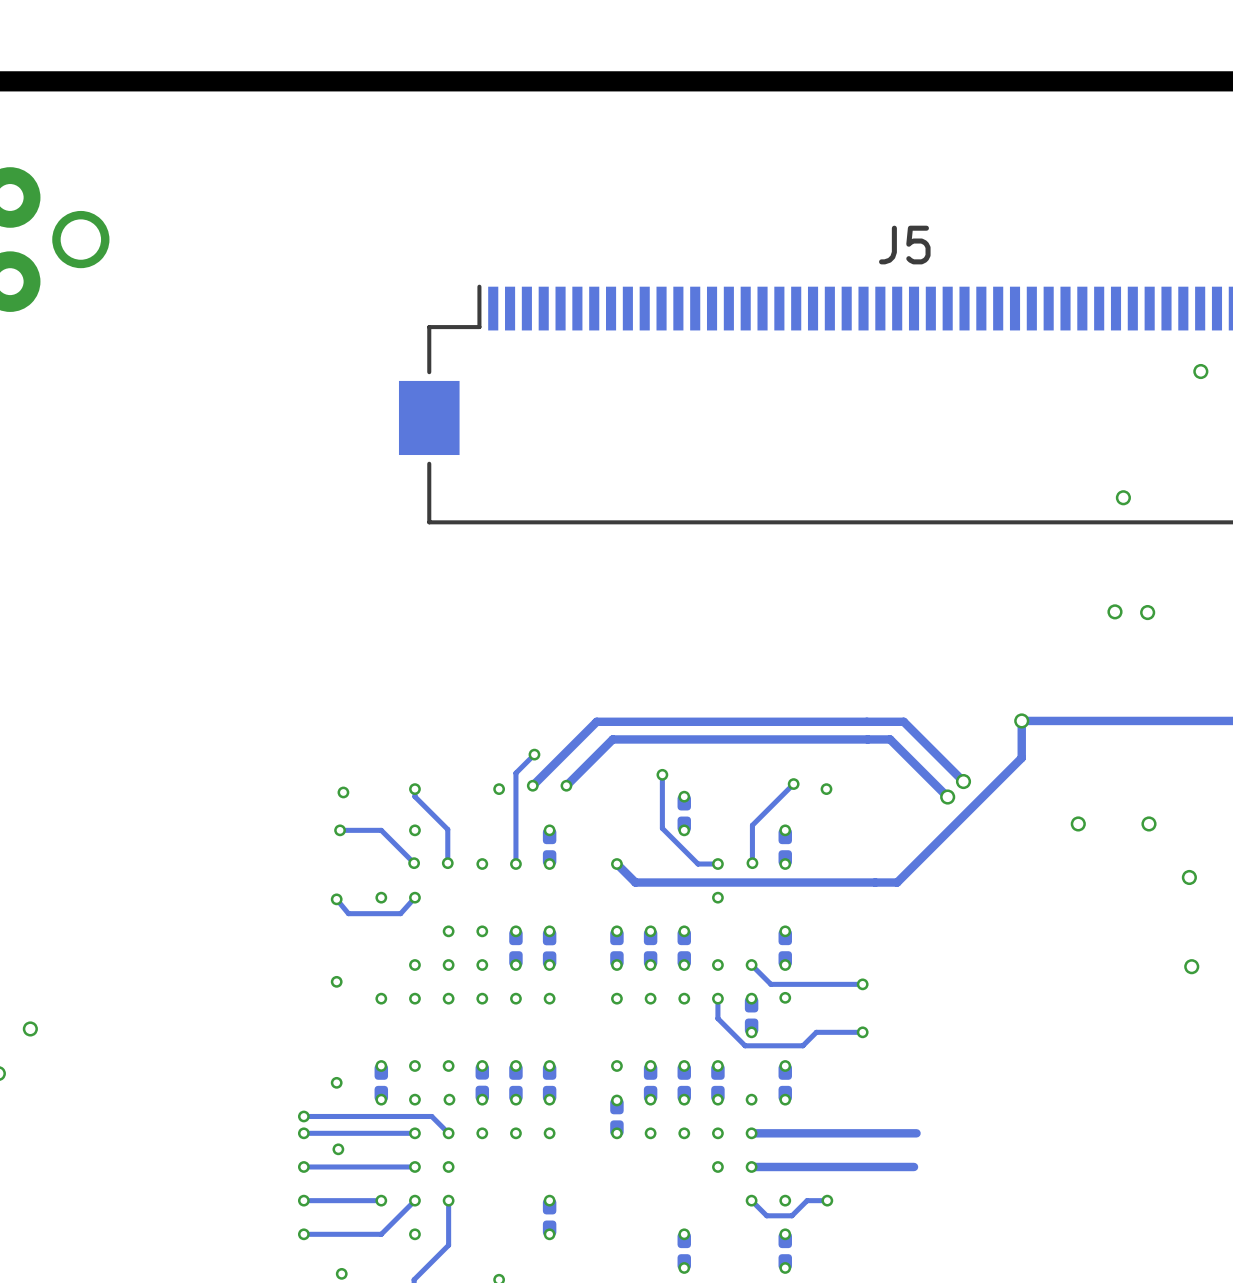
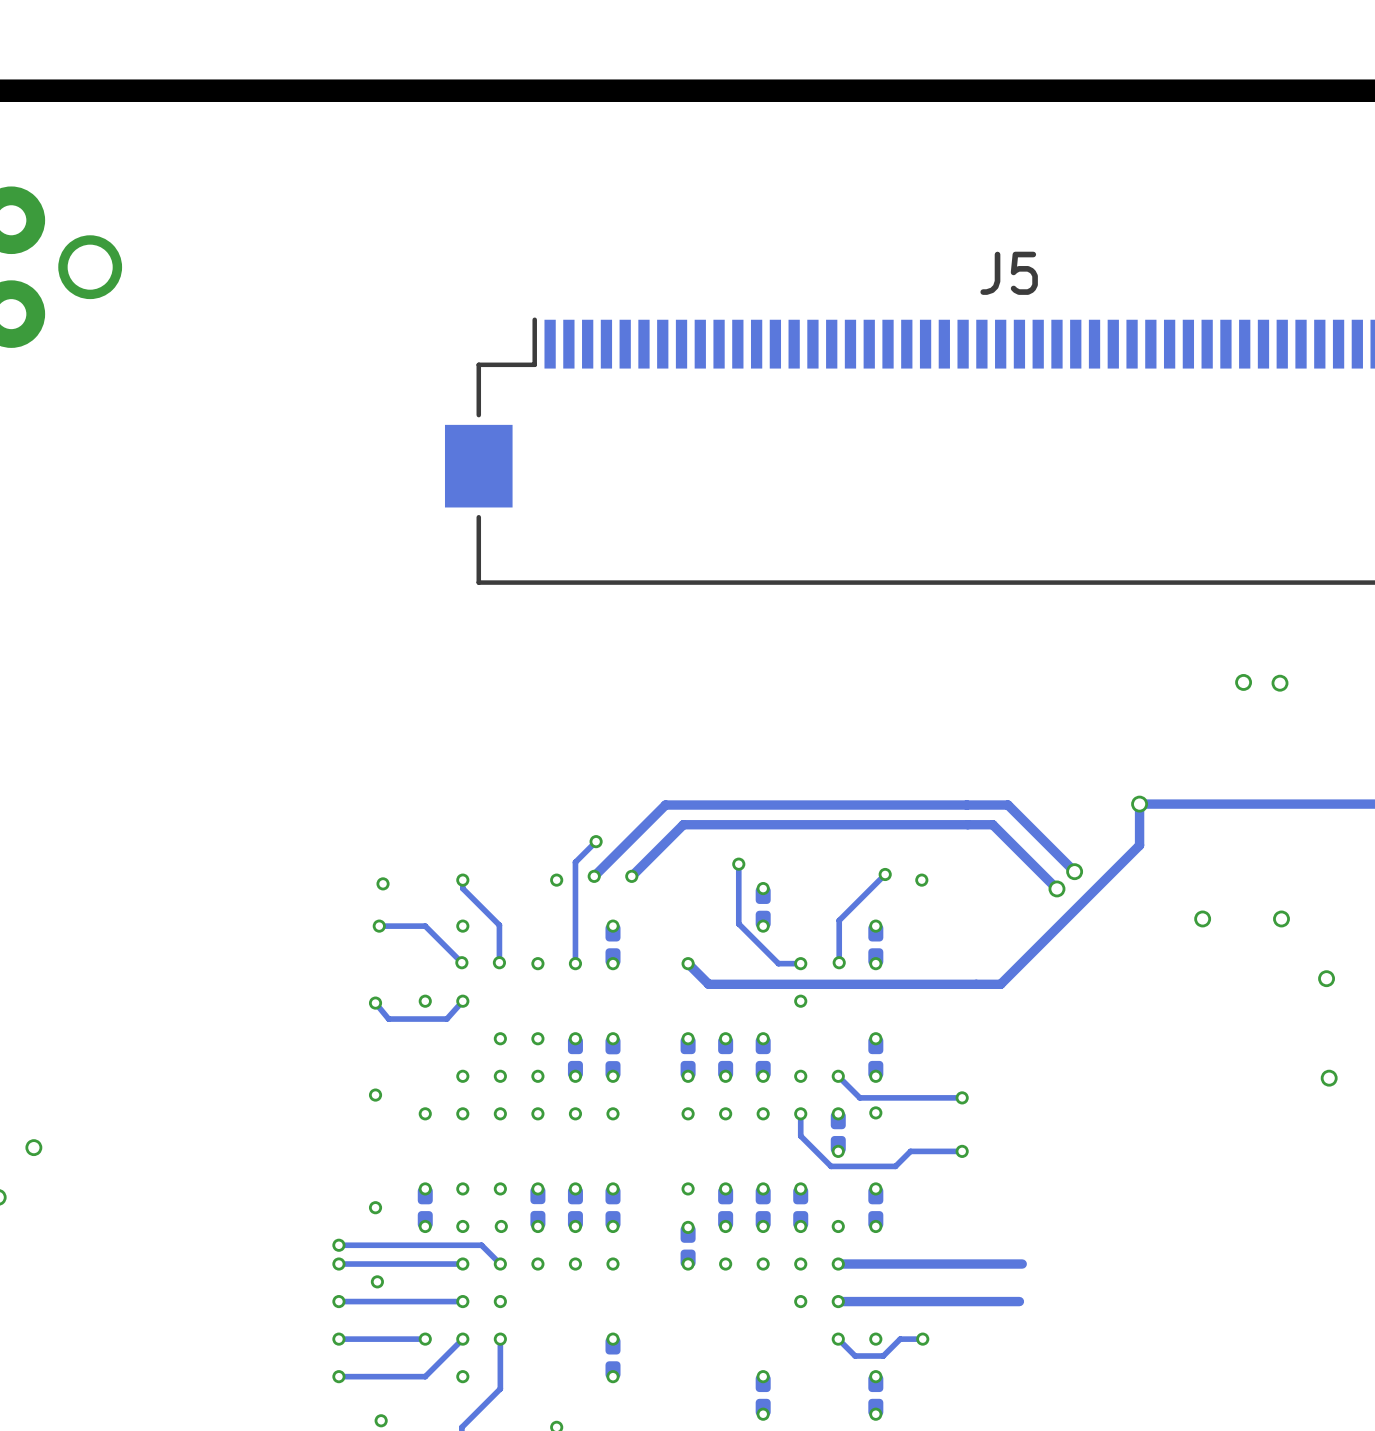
via: (1200, 371) -> none
via: (1123, 497) -> none

